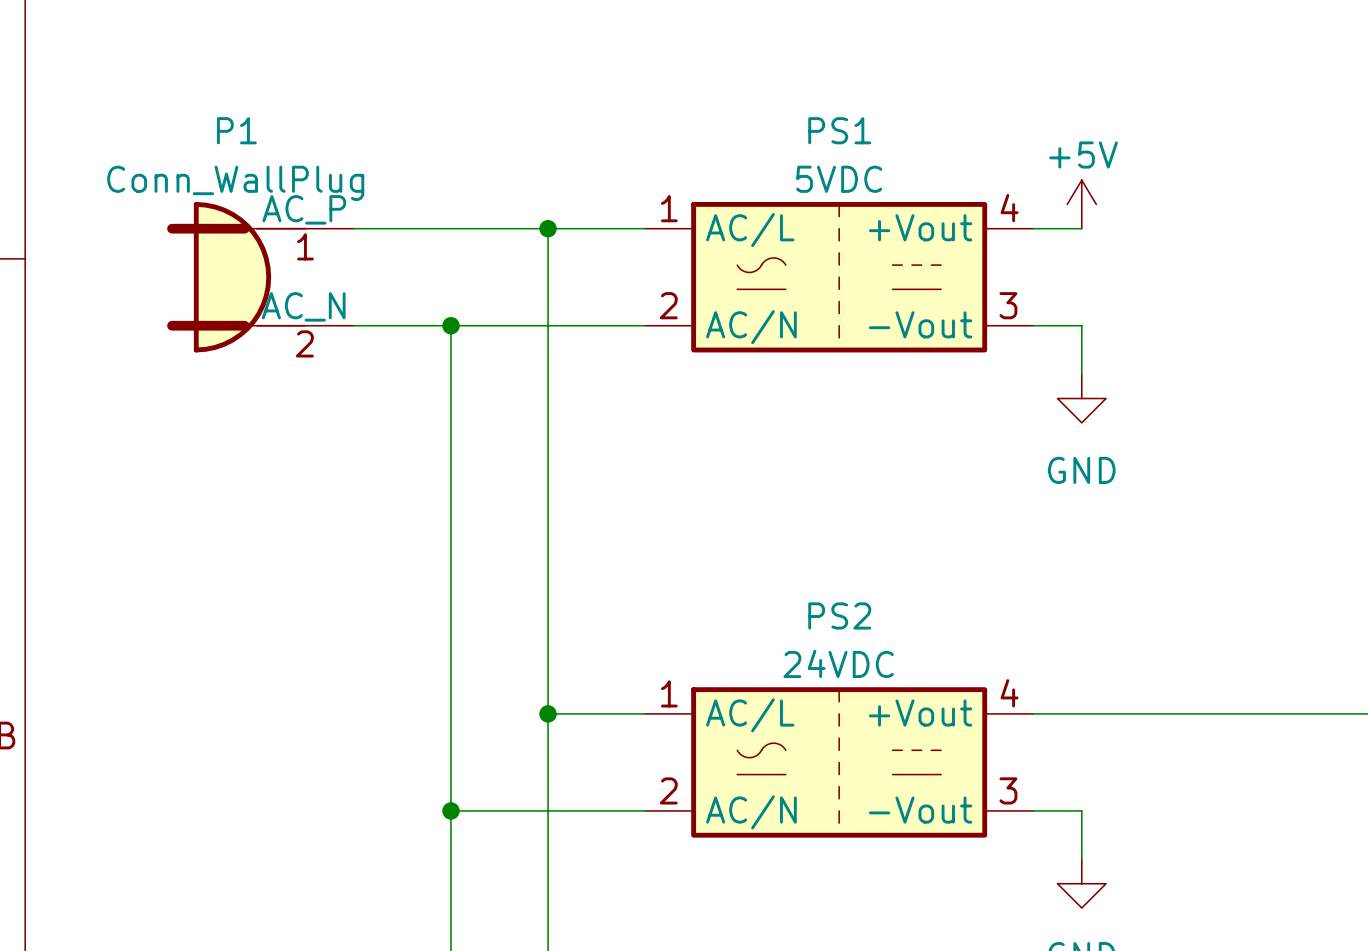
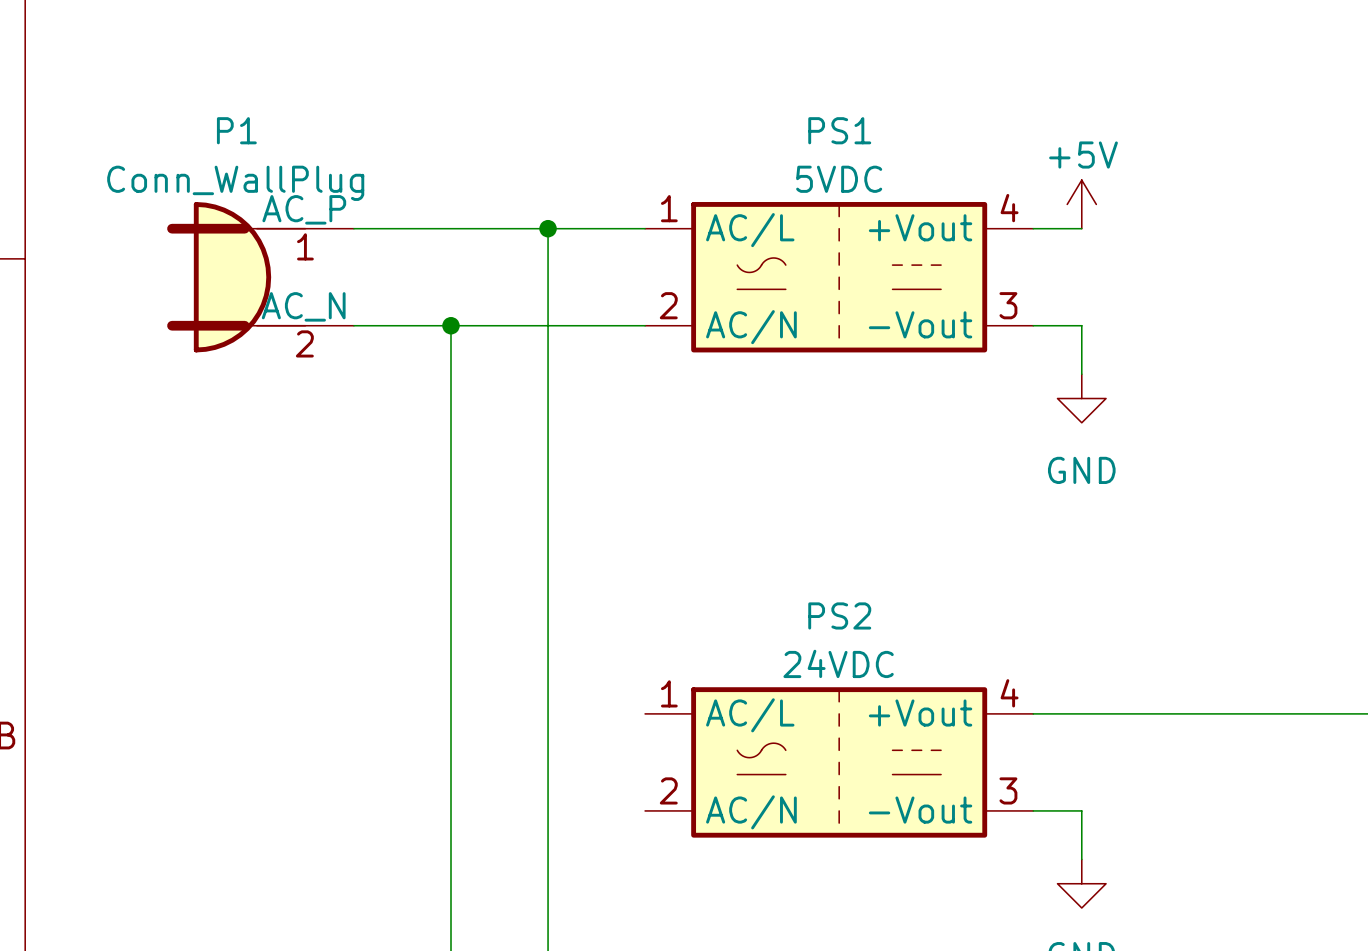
wire: (548, 713) (645, 713) -> none
junction: (548, 713) -> none
wire: (451, 810) (645, 810) -> none
junction: (451, 810) -> none

